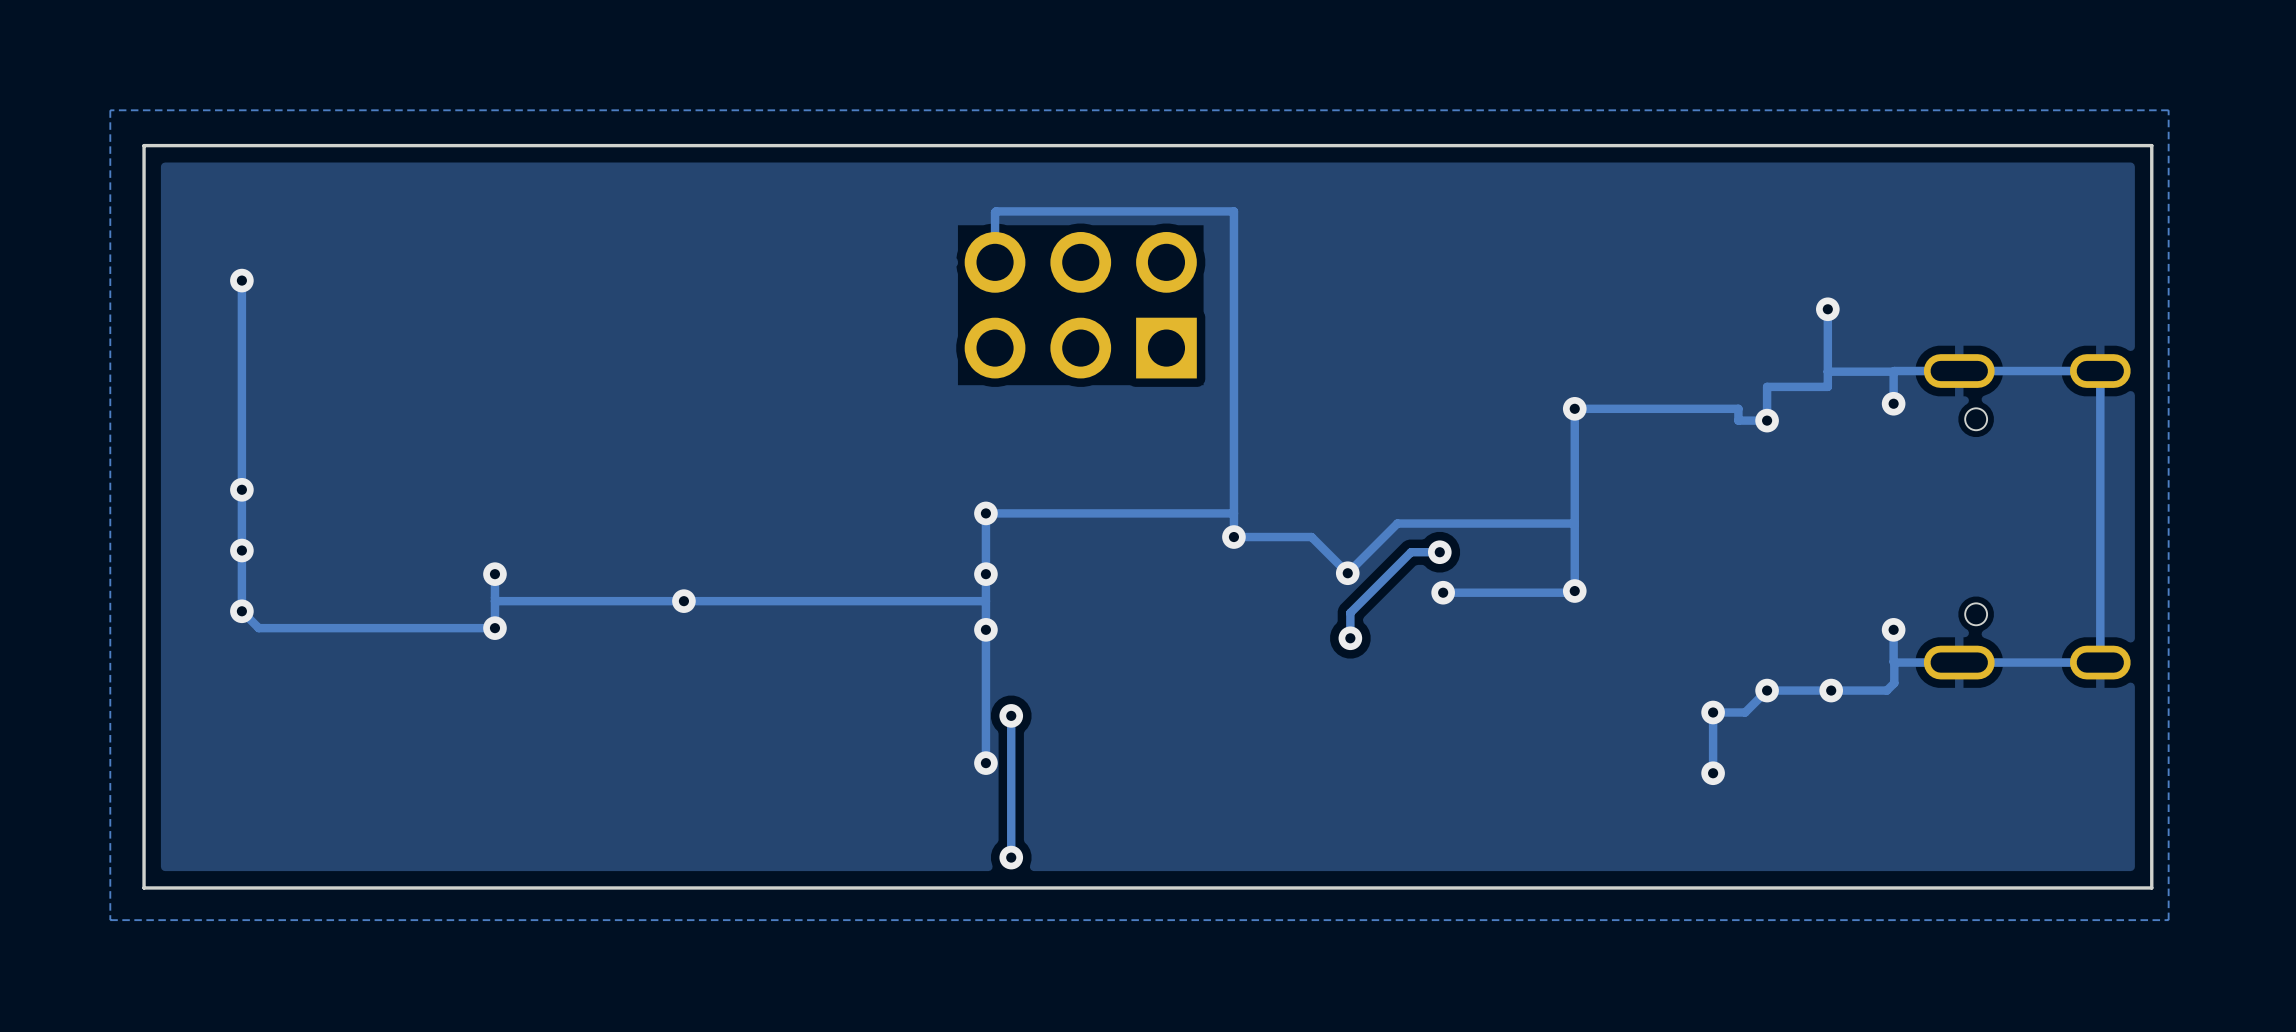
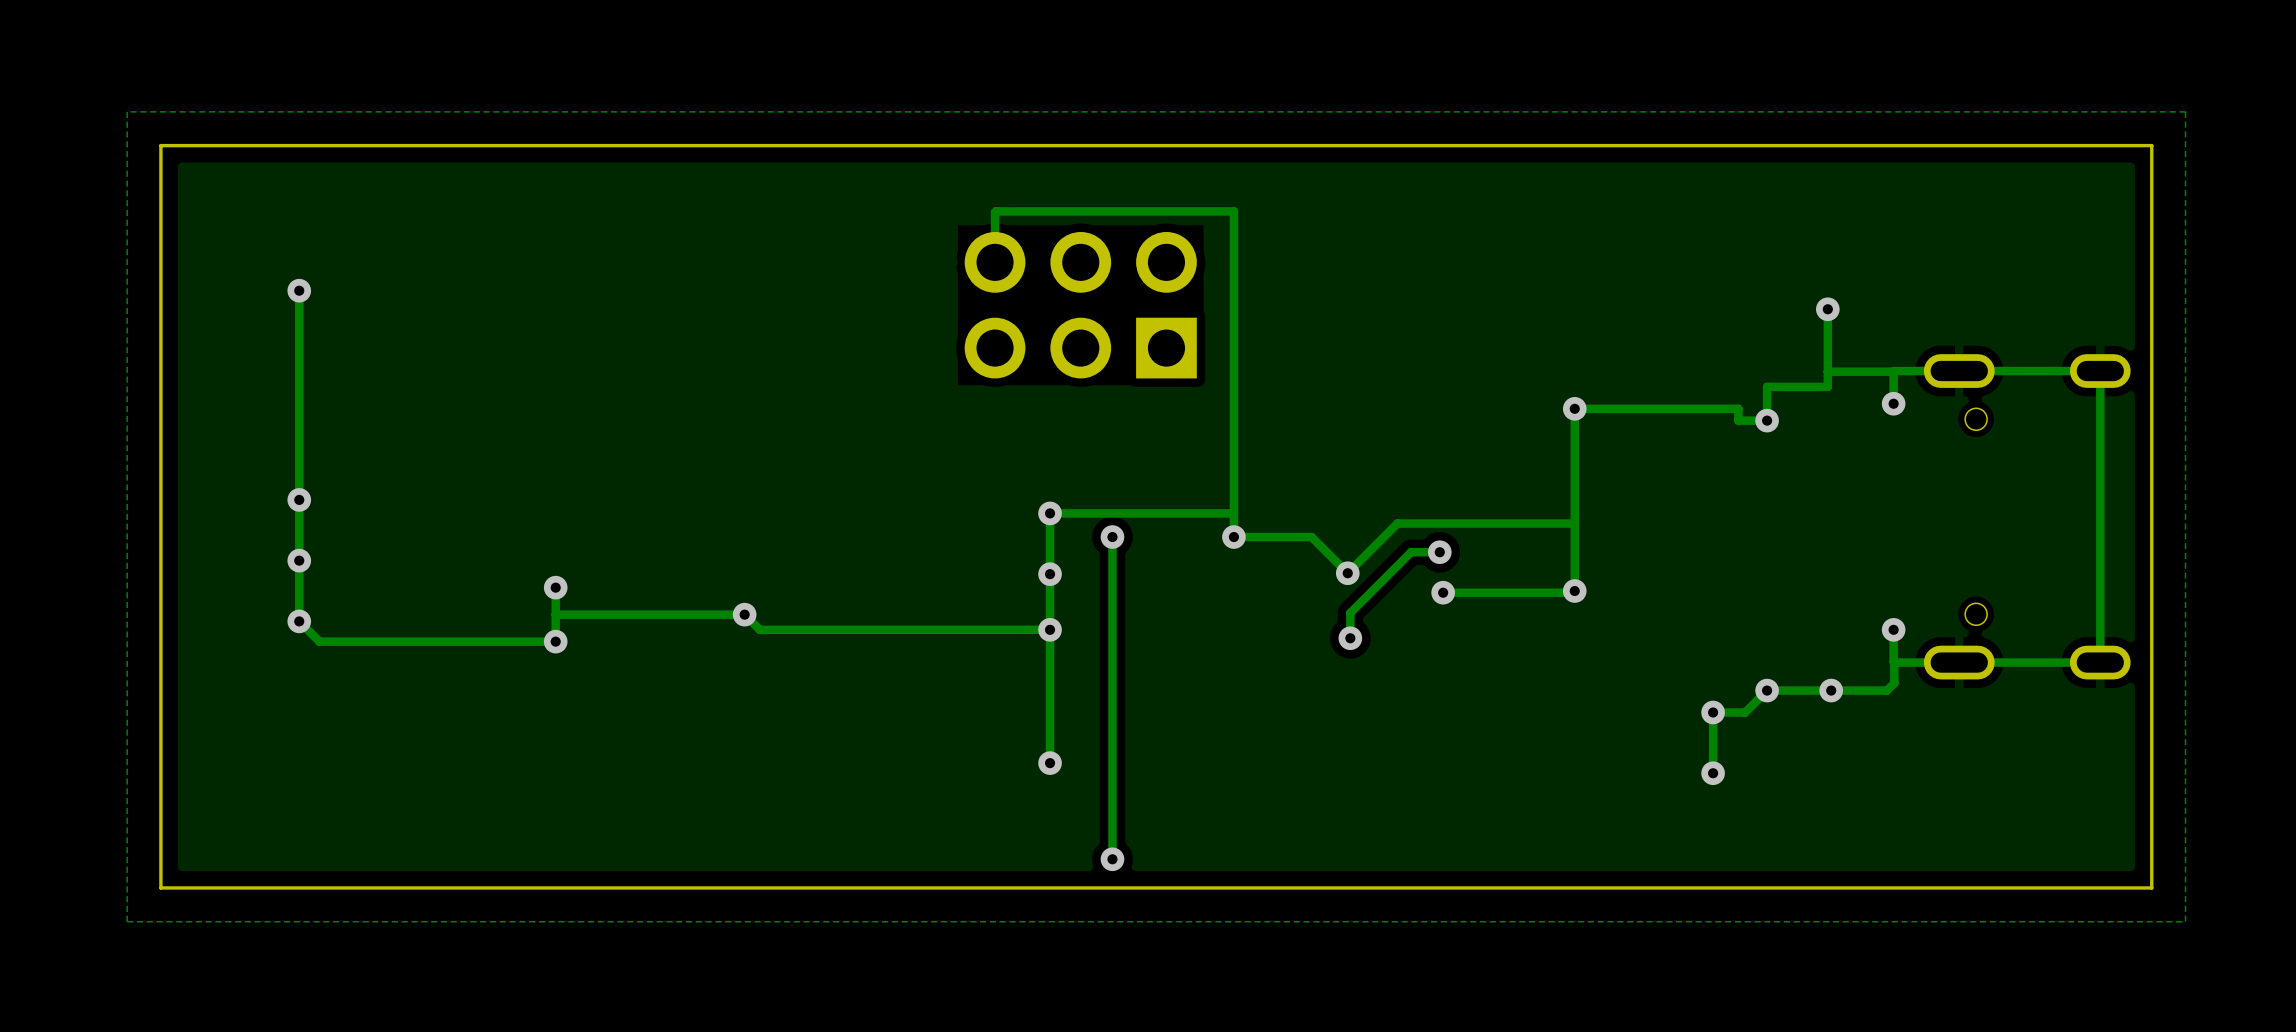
zone outline: (2168, 110) (110, 110) (110, 920) (2168, 920) (2168, 110) -> (2185, 111) (127, 111) (127, 921) (2185, 921) (2185, 111)
board edge: (160, 145) (144, 145) (144, 887) (160, 887) -> (160, 145) (160, 887)
track: (241, 280) (241, 611) (258, 628) (494, 628) (494, 574) -> none
via position: (241, 280) -> (299, 290)
track: none -> (299, 290) (299, 621) (319, 641) (555, 641) (555, 587)
via: (241, 489) -> none
via: none -> (299, 499)
via: (985, 513) -> none
track: (1050, 513) (985, 513) (985, 763) -> (1050, 513) (1050, 763)
via: none -> (1050, 513)
track: none -> (1112, 537) (1112, 859)
via: none -> (1112, 537)
via: (241, 550) -> none
via: none -> (299, 560)
via: (494, 574) -> none
via: (985, 574) -> none
via: none -> (1050, 574)
via: none -> (555, 587)
via position: (683, 601) -> (744, 614)
track: (985, 601) (494, 601) -> none
via: (241, 611) -> none
track: none -> (555, 614) (744, 614) (759, 629) (1050, 629)
via: none -> (299, 621)
via: (494, 628) -> none
via: (985, 629) -> none
via: none -> (1050, 629)
via: none -> (555, 641)
track: (1011, 715) (1011, 857) -> none
via: (1011, 715) -> none
via: (985, 763) -> none
via: none -> (1050, 763)
via: (1011, 857) -> none
via: none -> (1112, 859)

